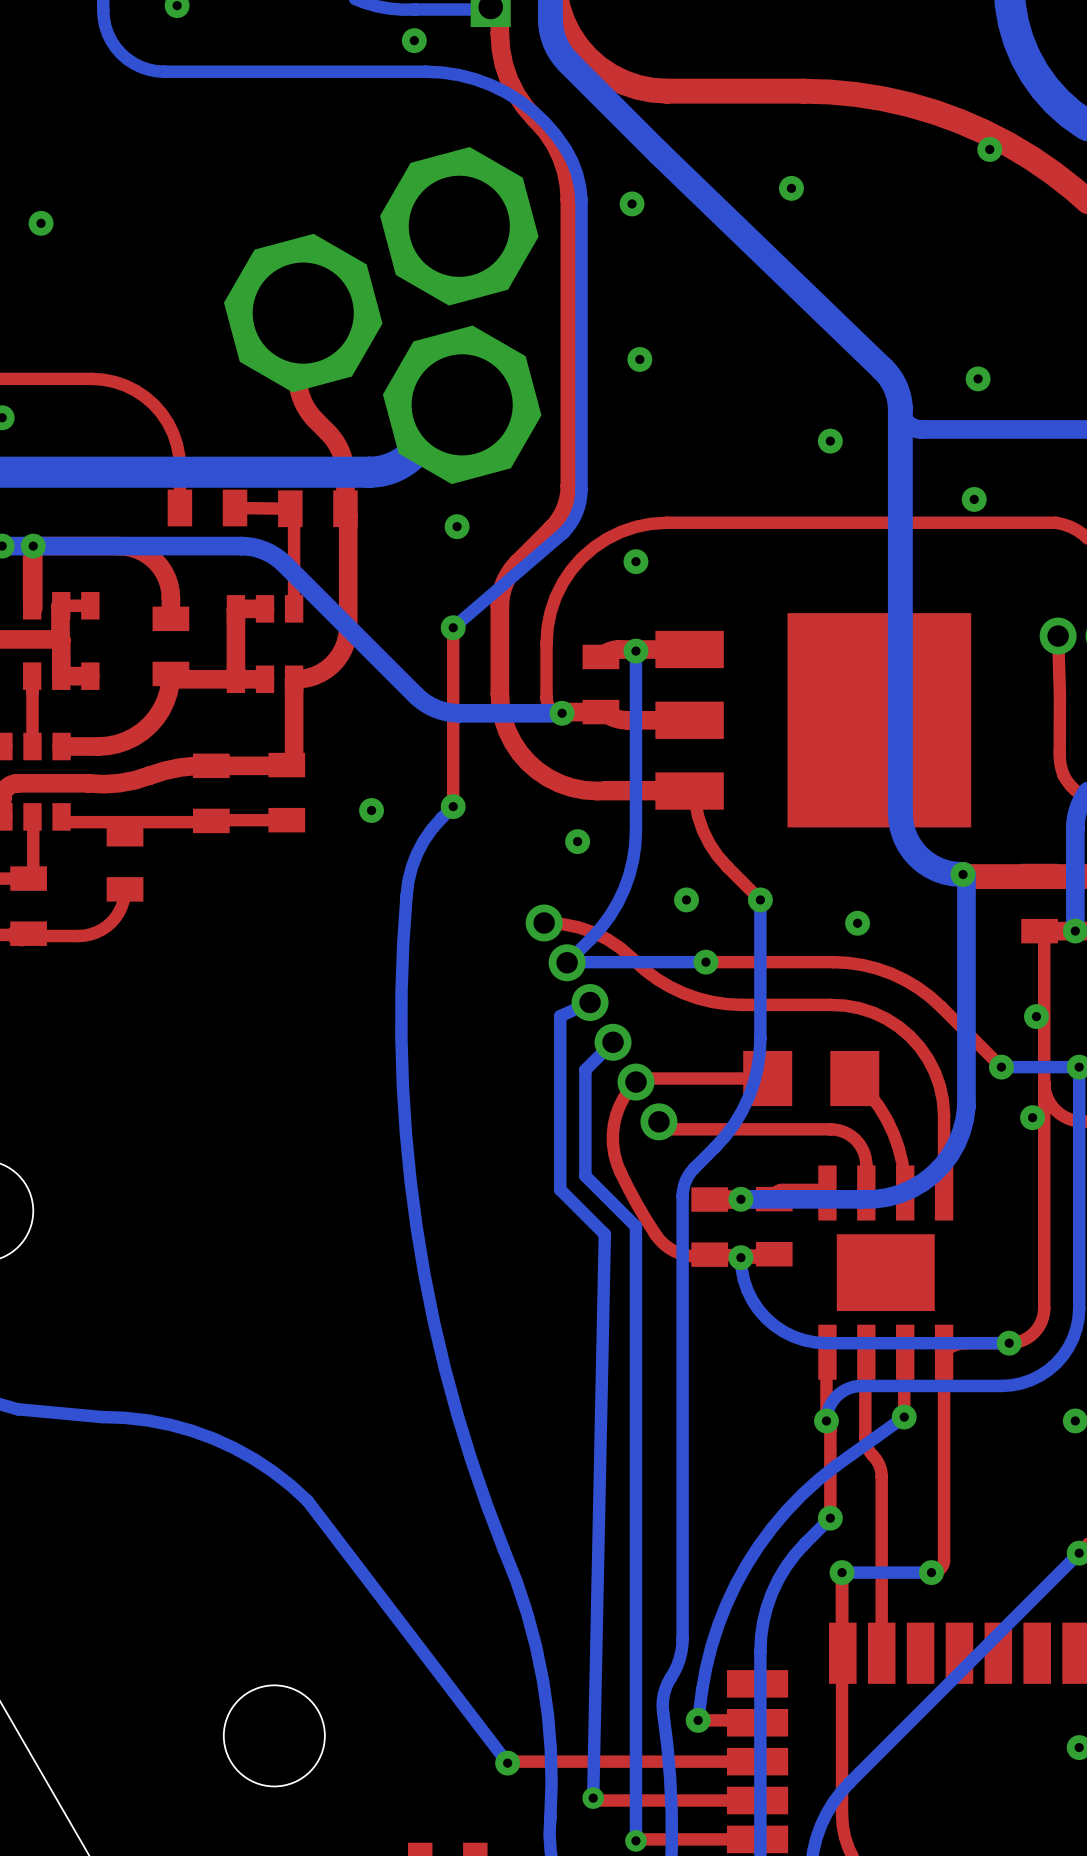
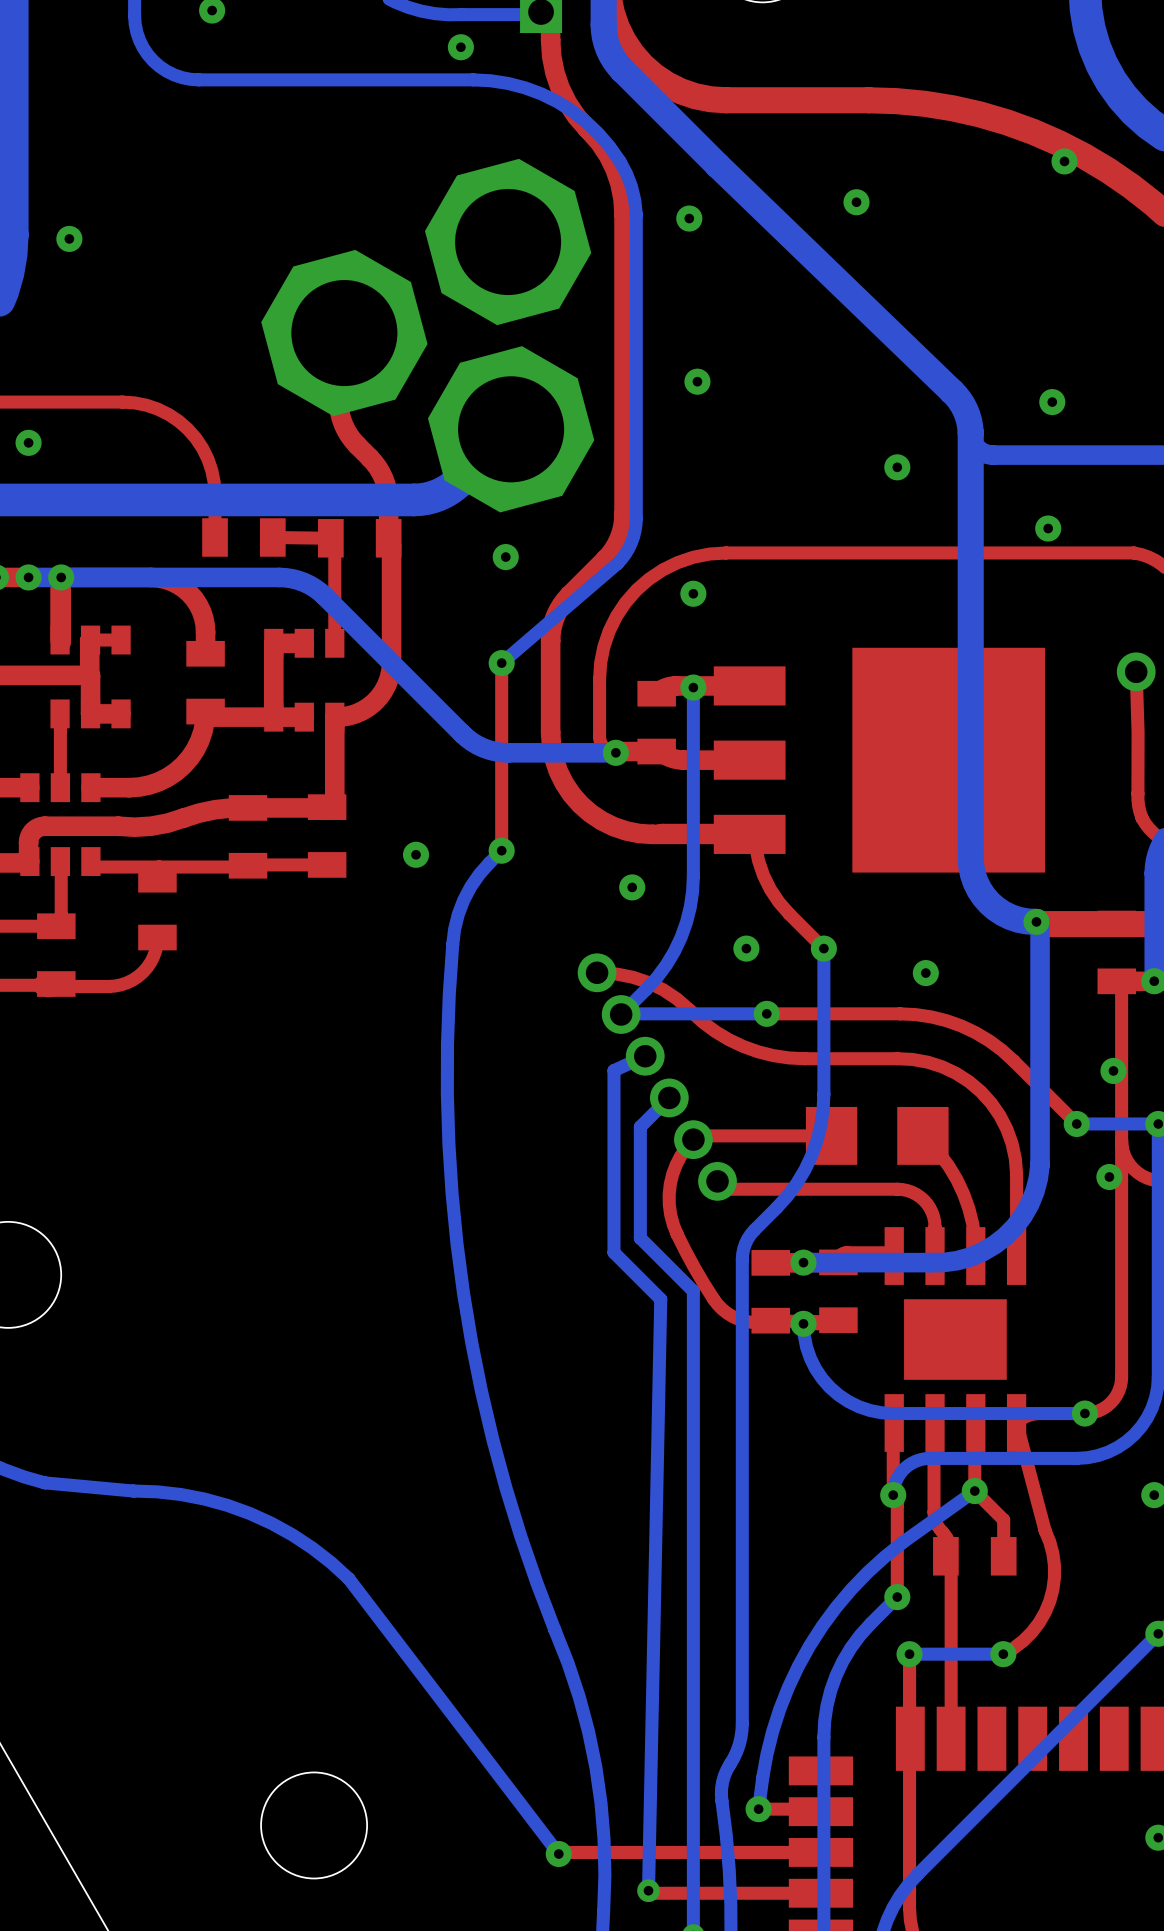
top track: (944, 1352) (944, 1559) (940, 1568) (931, 1572) -> (1016, 1423) (1052, 1553) (1054, 1577) (1049, 1601) (1039, 1622) (1023, 1640) (1003, 1654)
top track: none -> (974, 1491) (1003, 1519) (1003, 1556)
part: none -> (974, 1556)

